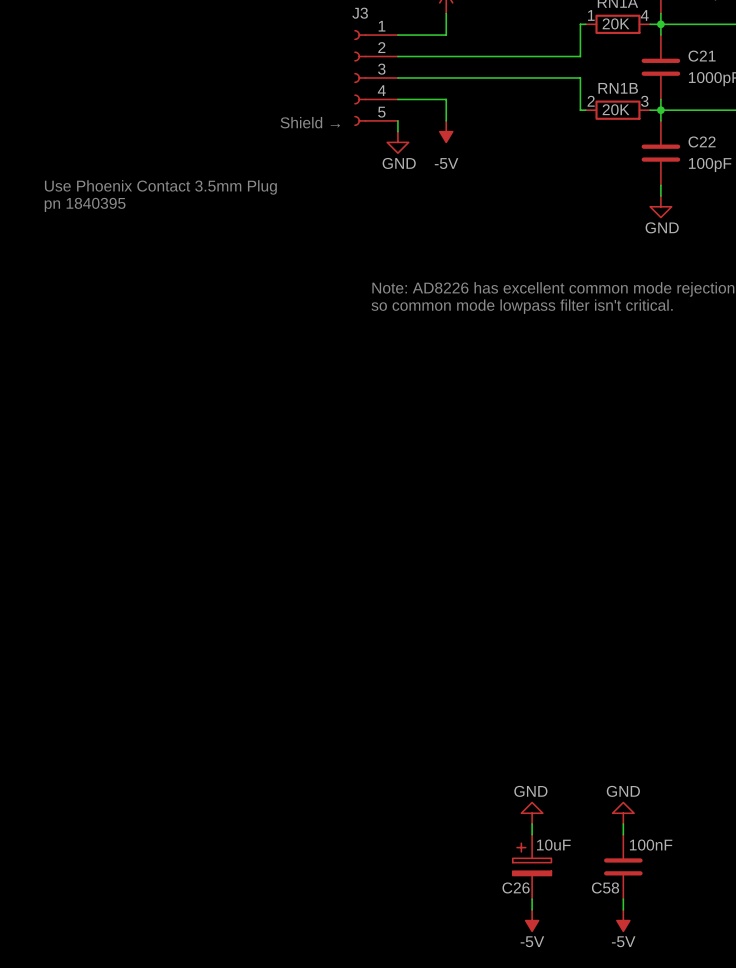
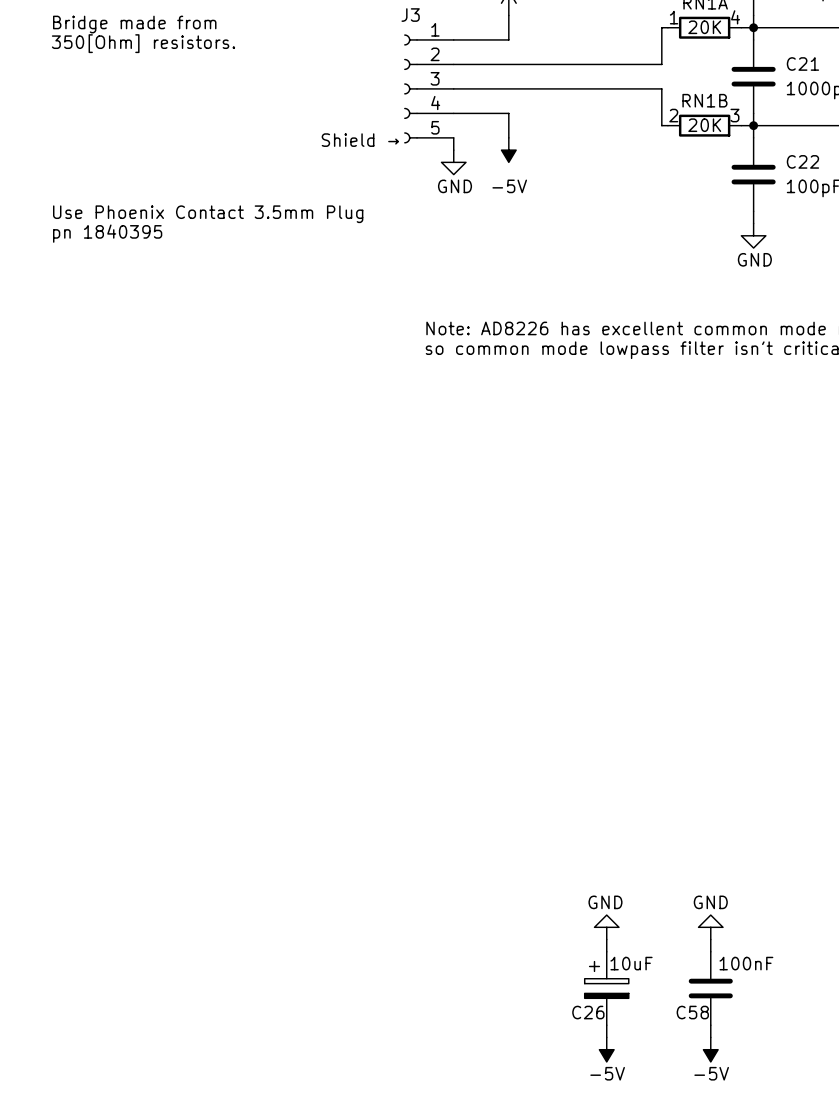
text: none -> Bridge made from (134, 24)
text: none -> 350[Ohm] resistors. (143, 43)

